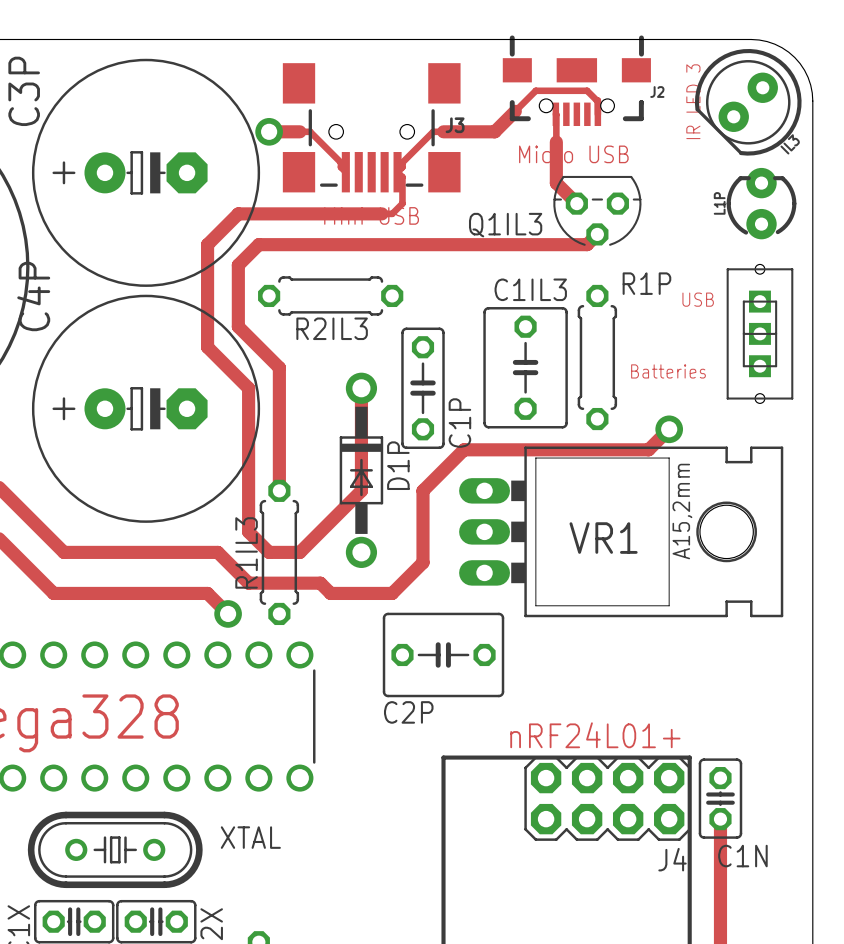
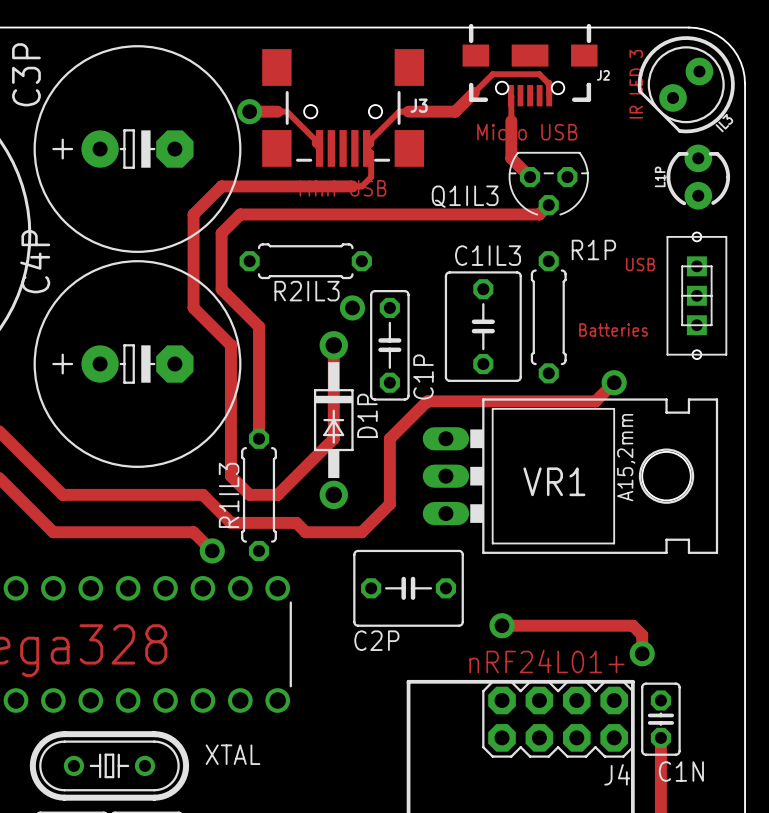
via: none -> (352, 307)
track: none -> (502, 625) (632, 625) (642, 635) (642, 653)
via: none -> (502, 625)
via: none -> (642, 653)

